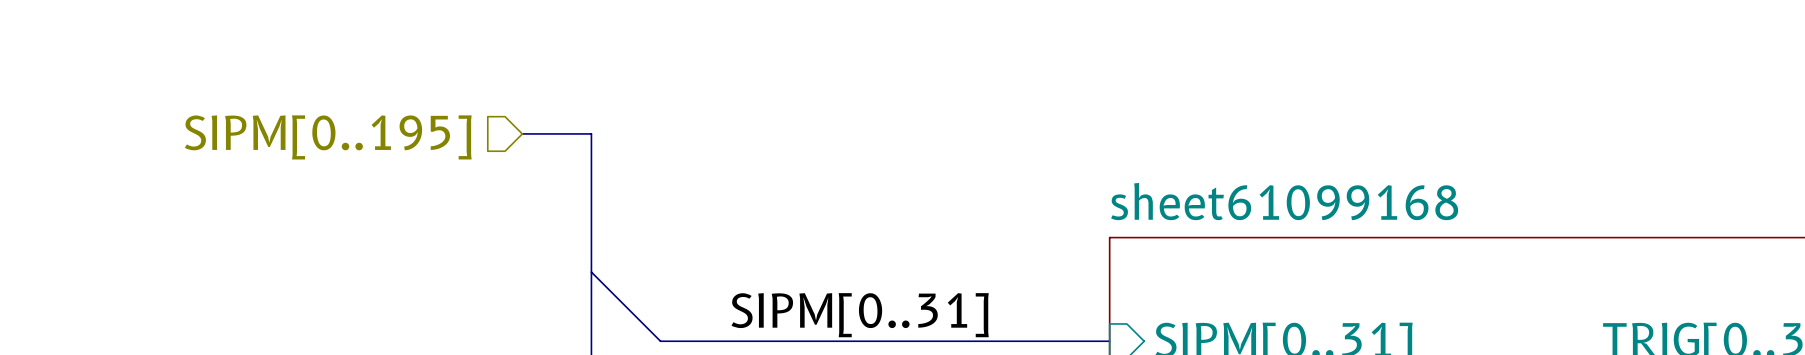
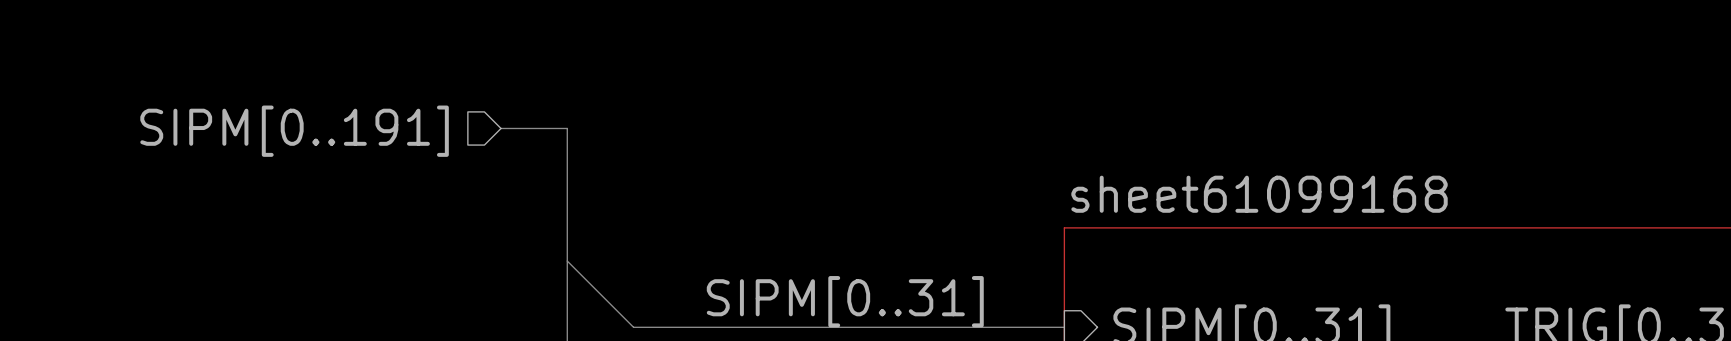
hierarchical label: SIPM[0..195] (328, 137) -> SIPM[0..191] (294, 131)

